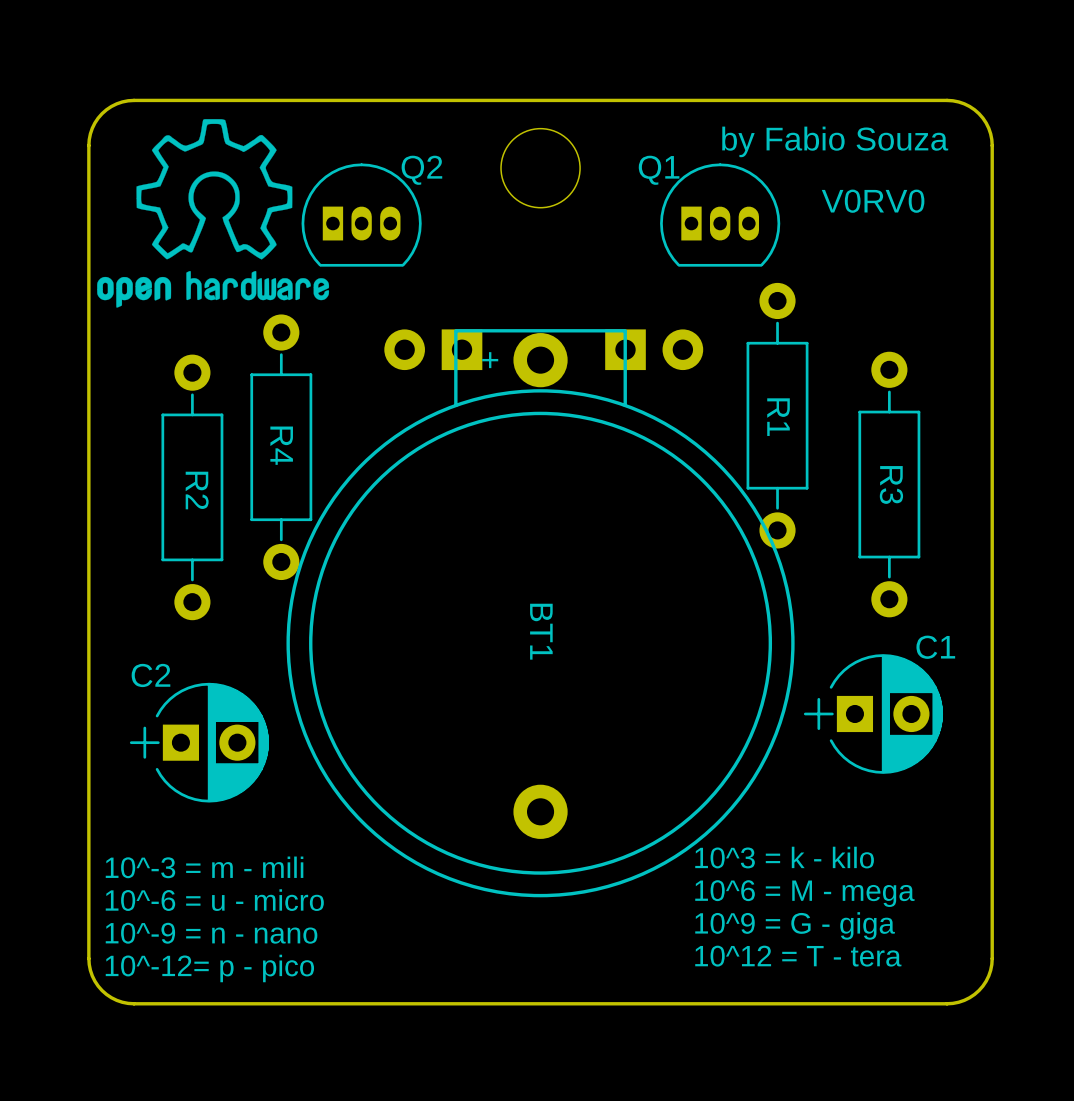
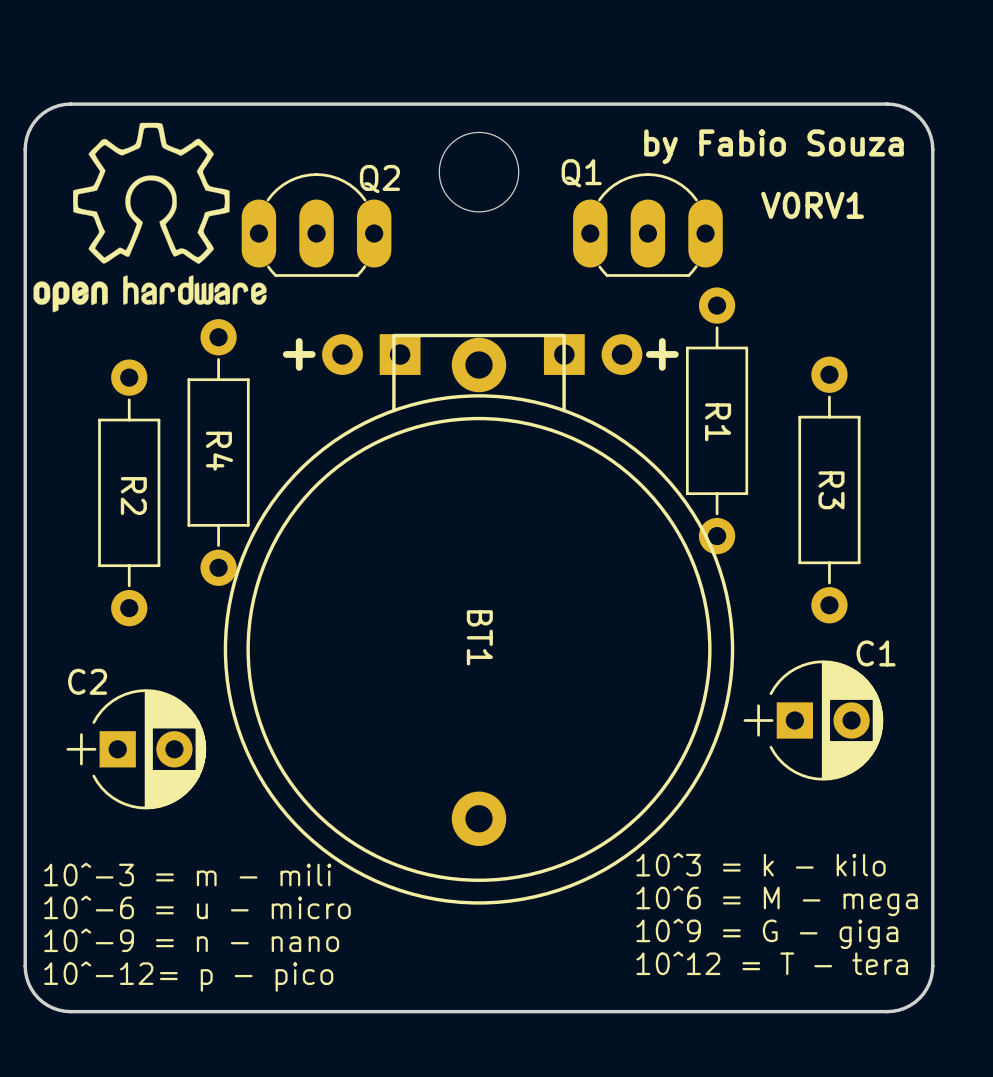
Q2 footprint: [301, 163, 422, 267] -> [241, 173, 392, 277]
Q1 footprint: [660, 163, 781, 267] -> [573, 173, 723, 277]
text: V0RV0 (873, 201) -> V0RV1 (812, 205)
text: none -> + (299, 354)
text: none -> + (662, 354)
BT1 text: + (490, 360) -> none

